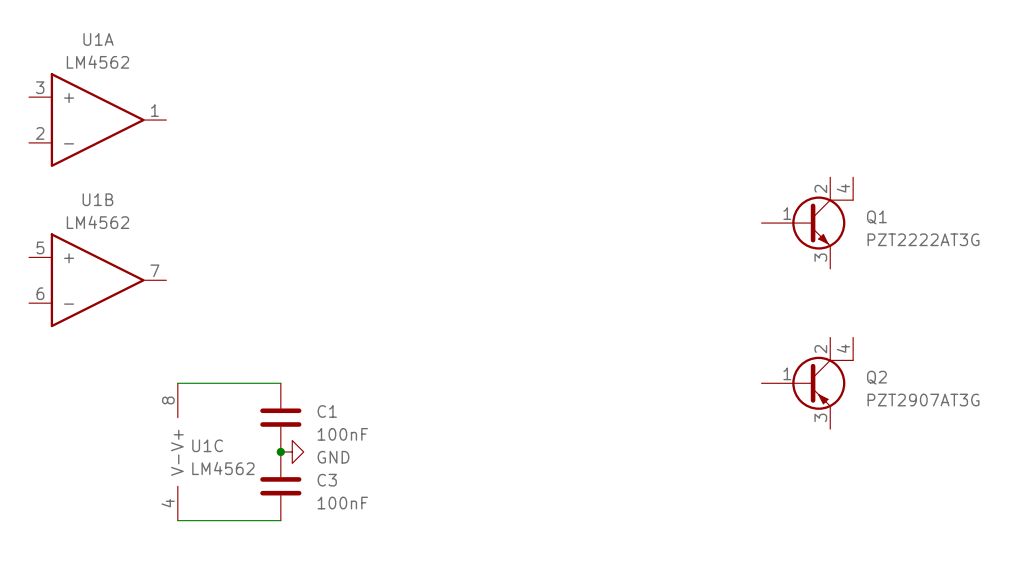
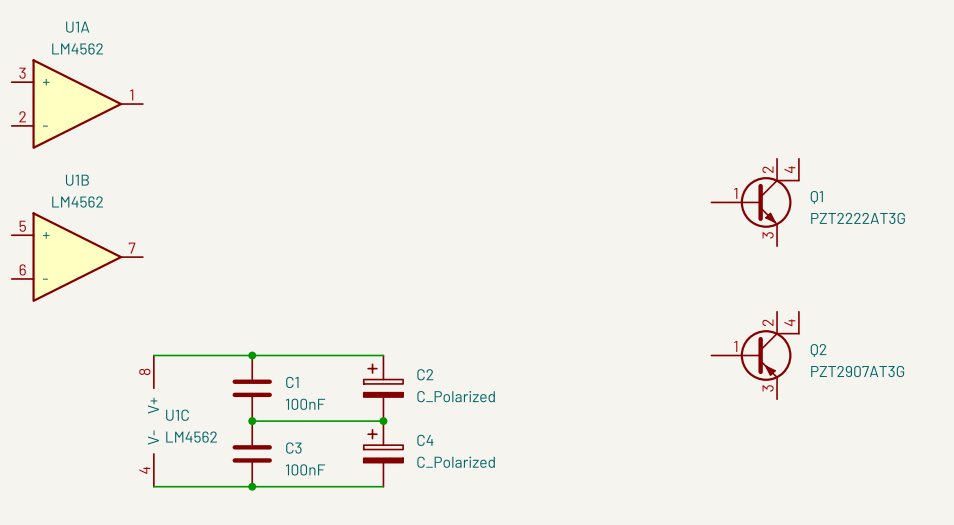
wire: none -> (252, 355) (383, 355)
junction: none -> (252, 355)
C2: none -> C_Polarized (383, 388)
wire: none -> (252, 421) (383, 421)
power symbol: GND (292, 451) -> none
junction: none -> (383, 421)
C4: none -> C_Polarized (383, 453)
wire: none -> (252, 486) (383, 486)
junction: none -> (252, 486)

